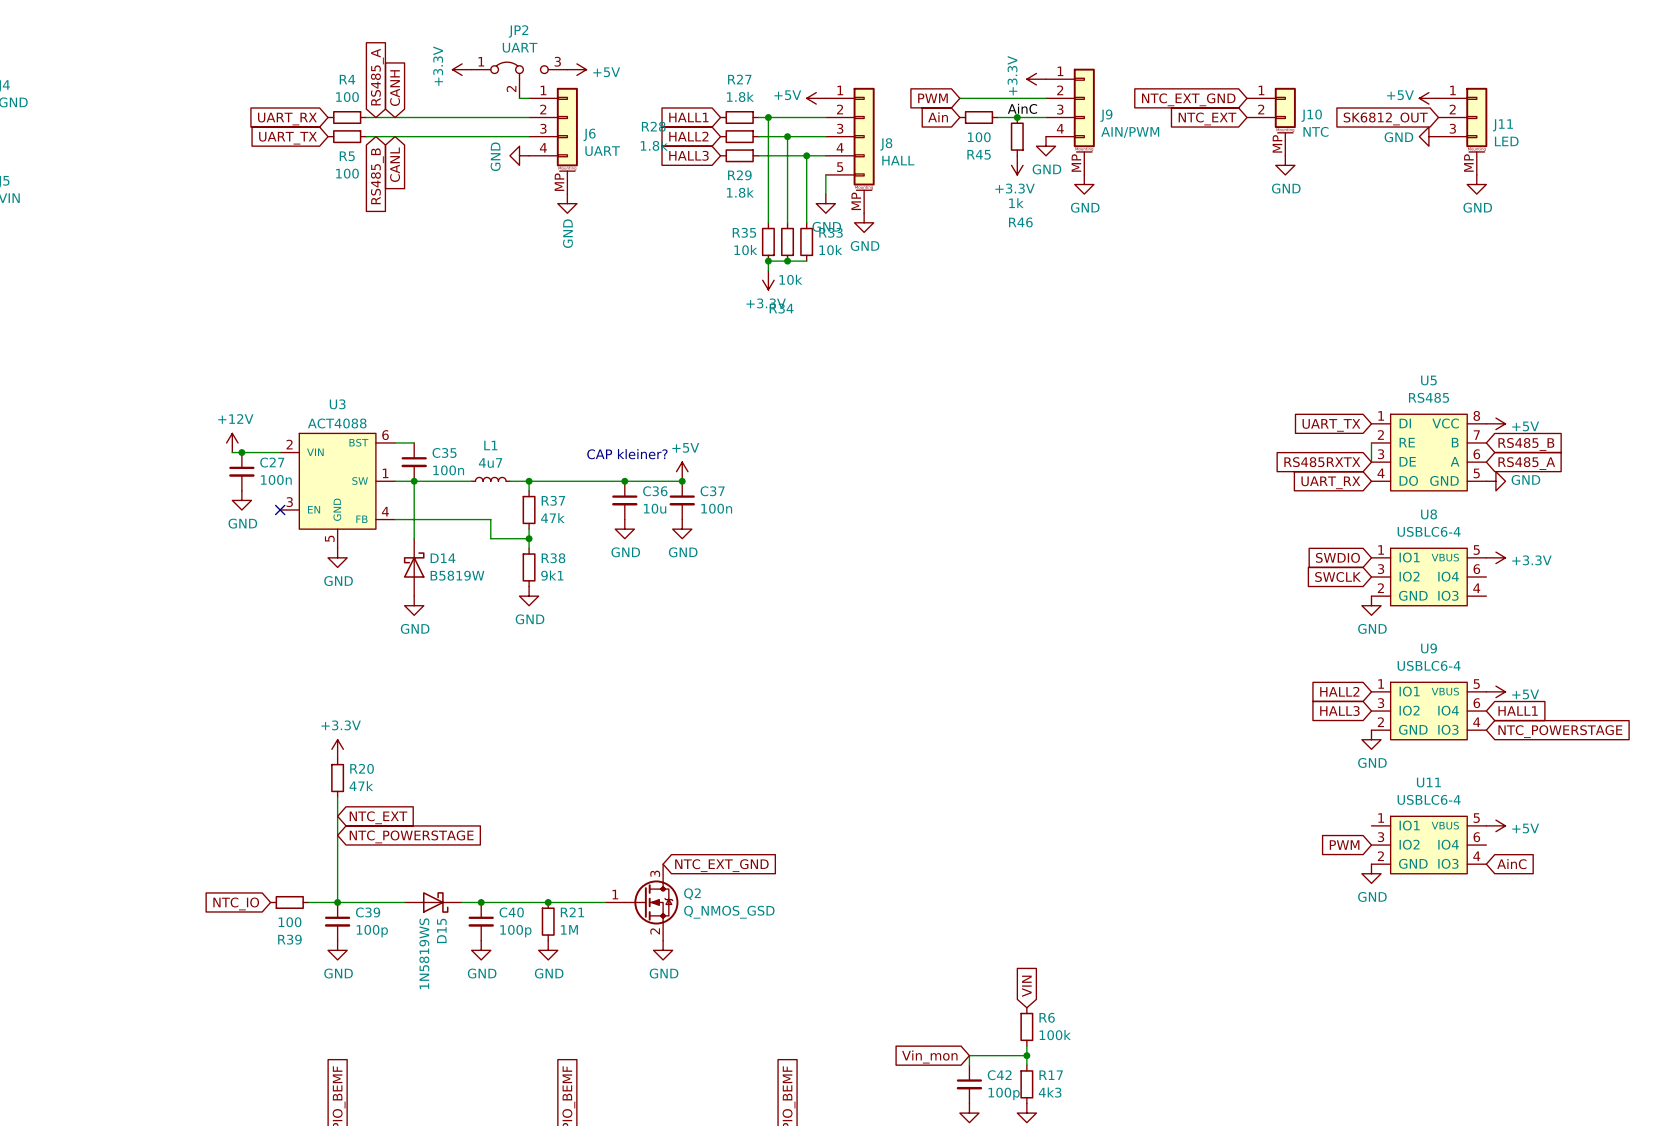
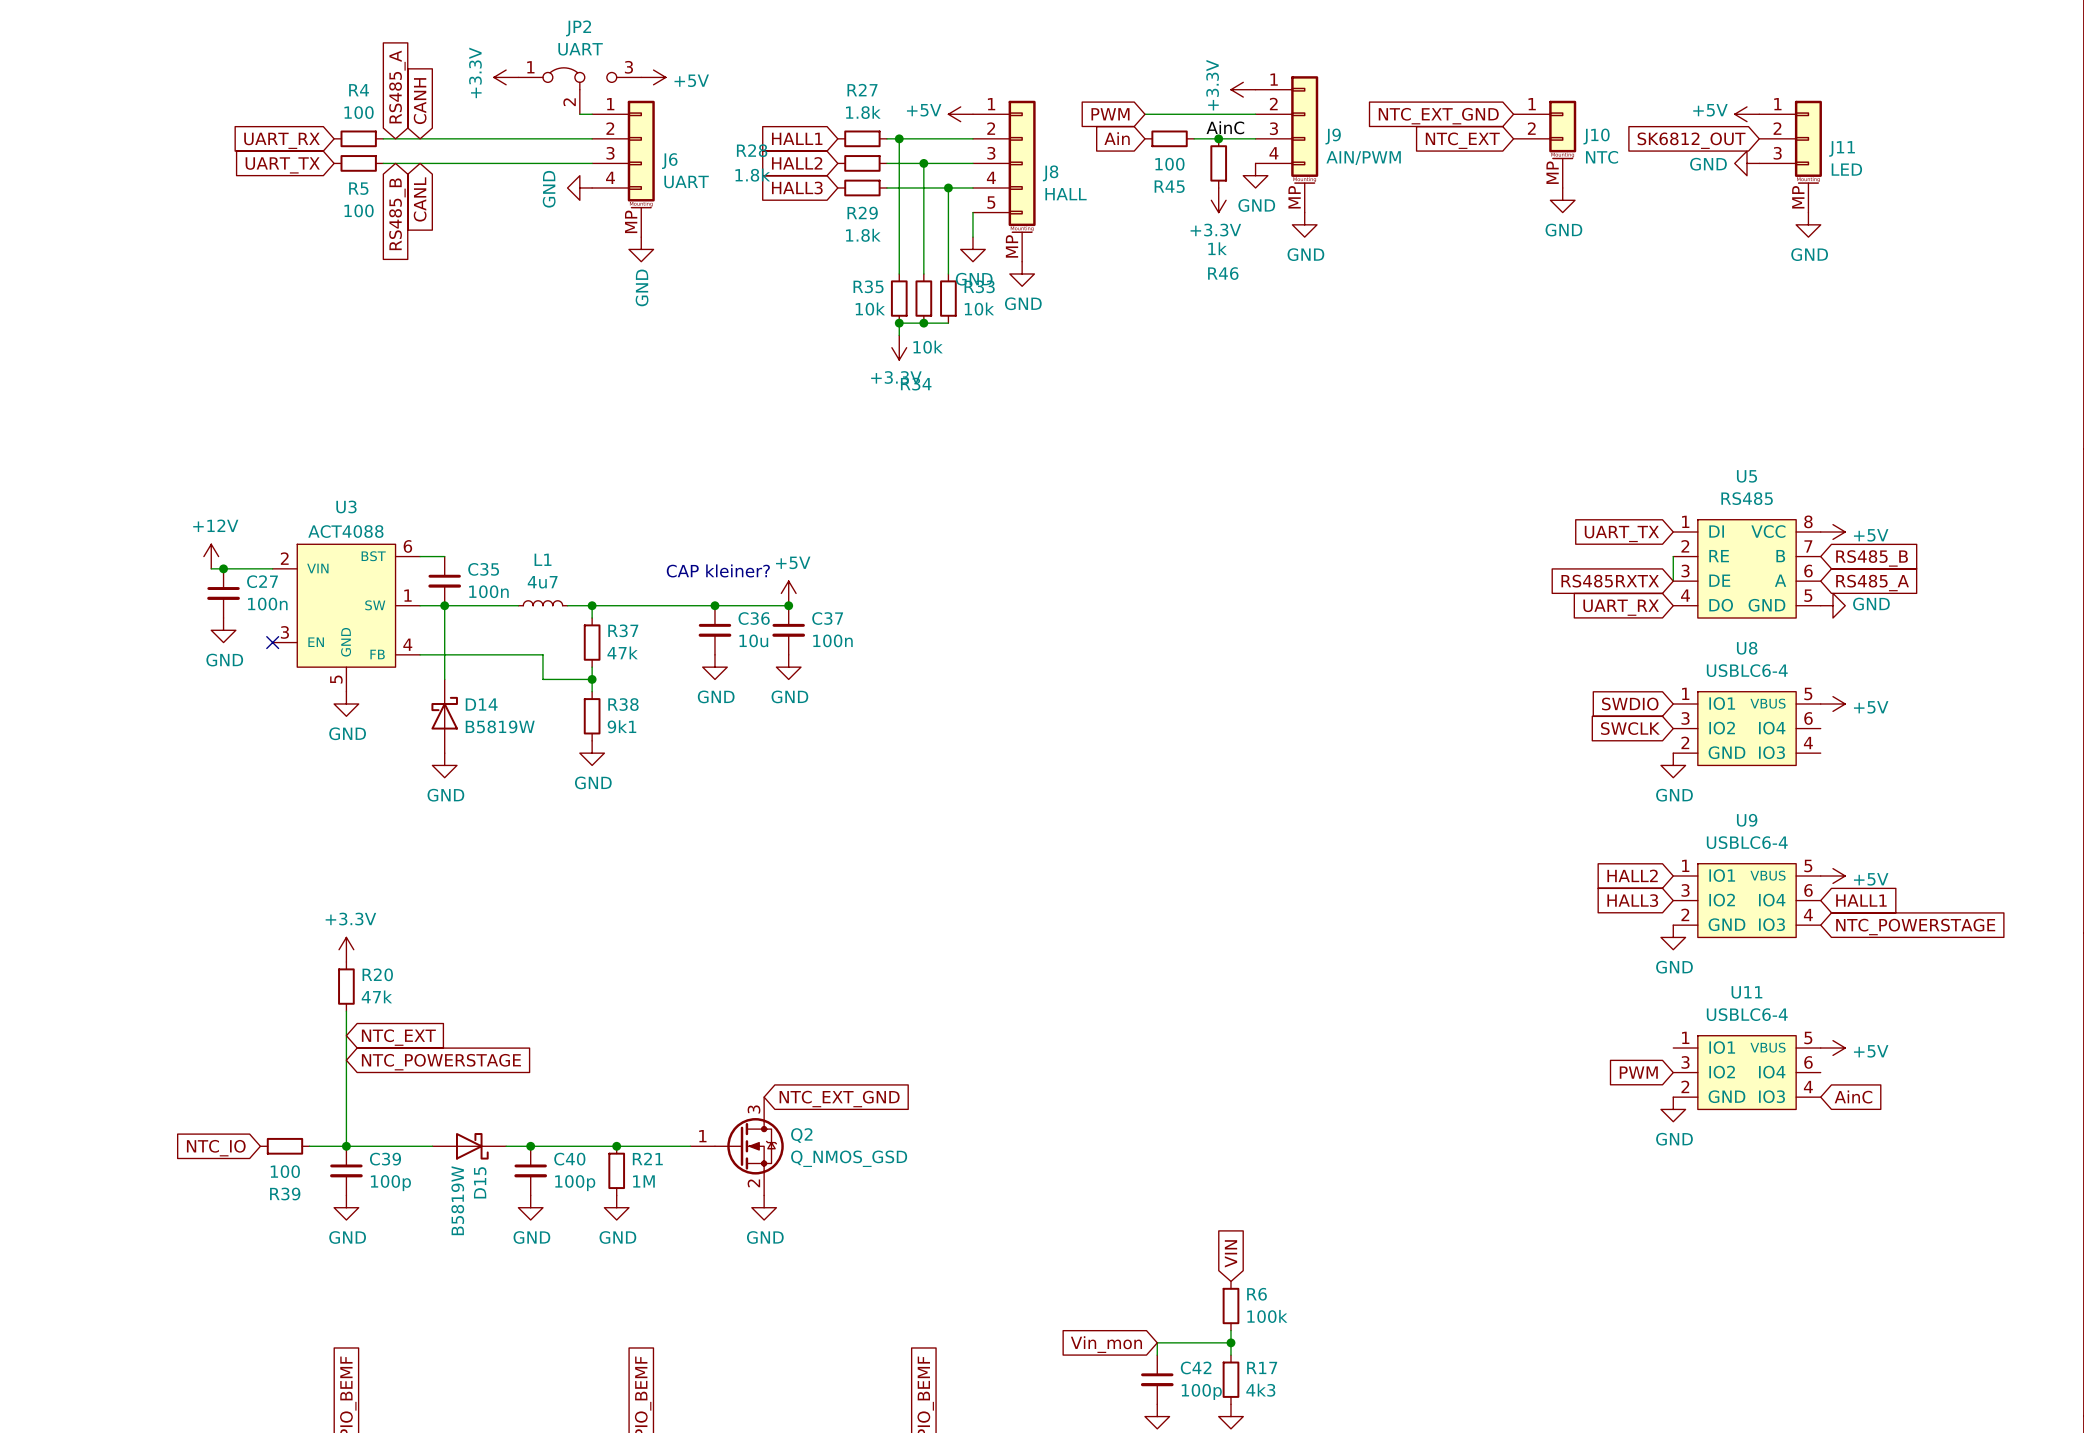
power symbol: +3.3V (1495, 557) -> +5V (1833, 704)
D15 value: 1N5819WS (424, 953) -> B5819W (457, 1200)

